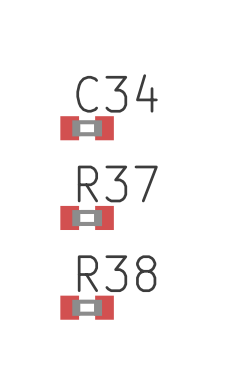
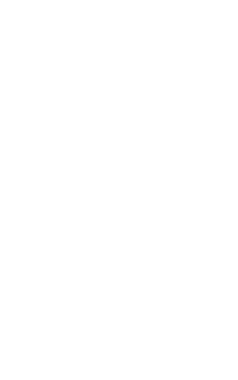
C34: (87, 128) -> none
R37: (87, 217) -> none
R38: (87, 307) -> none

